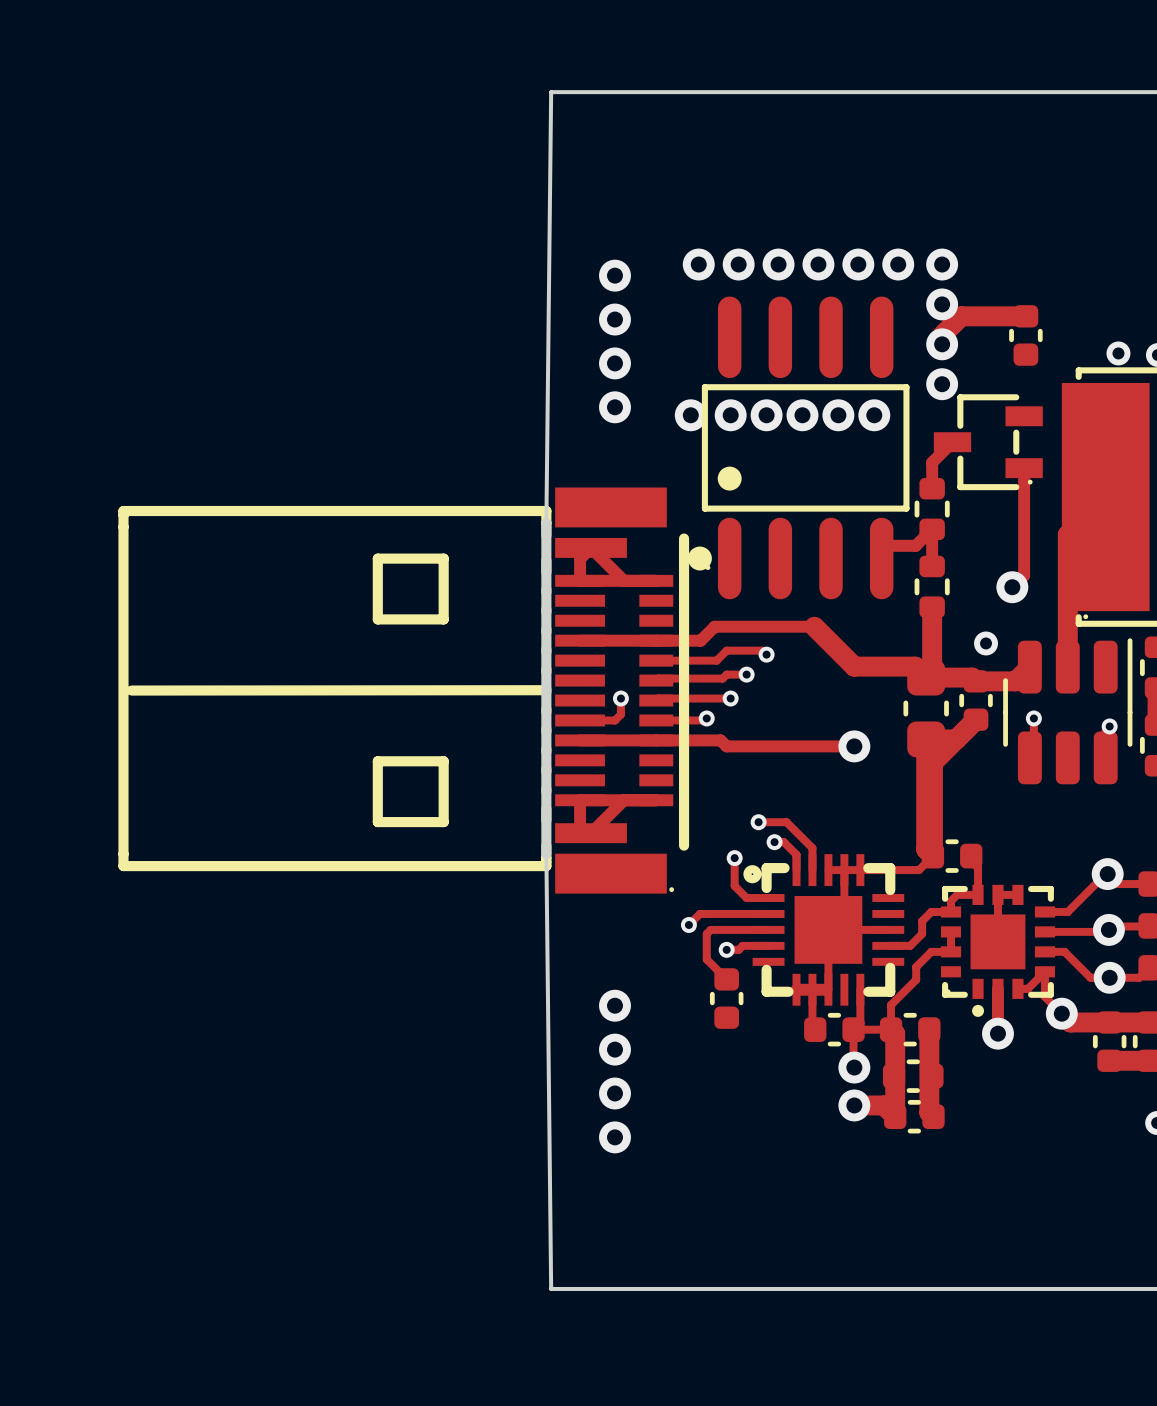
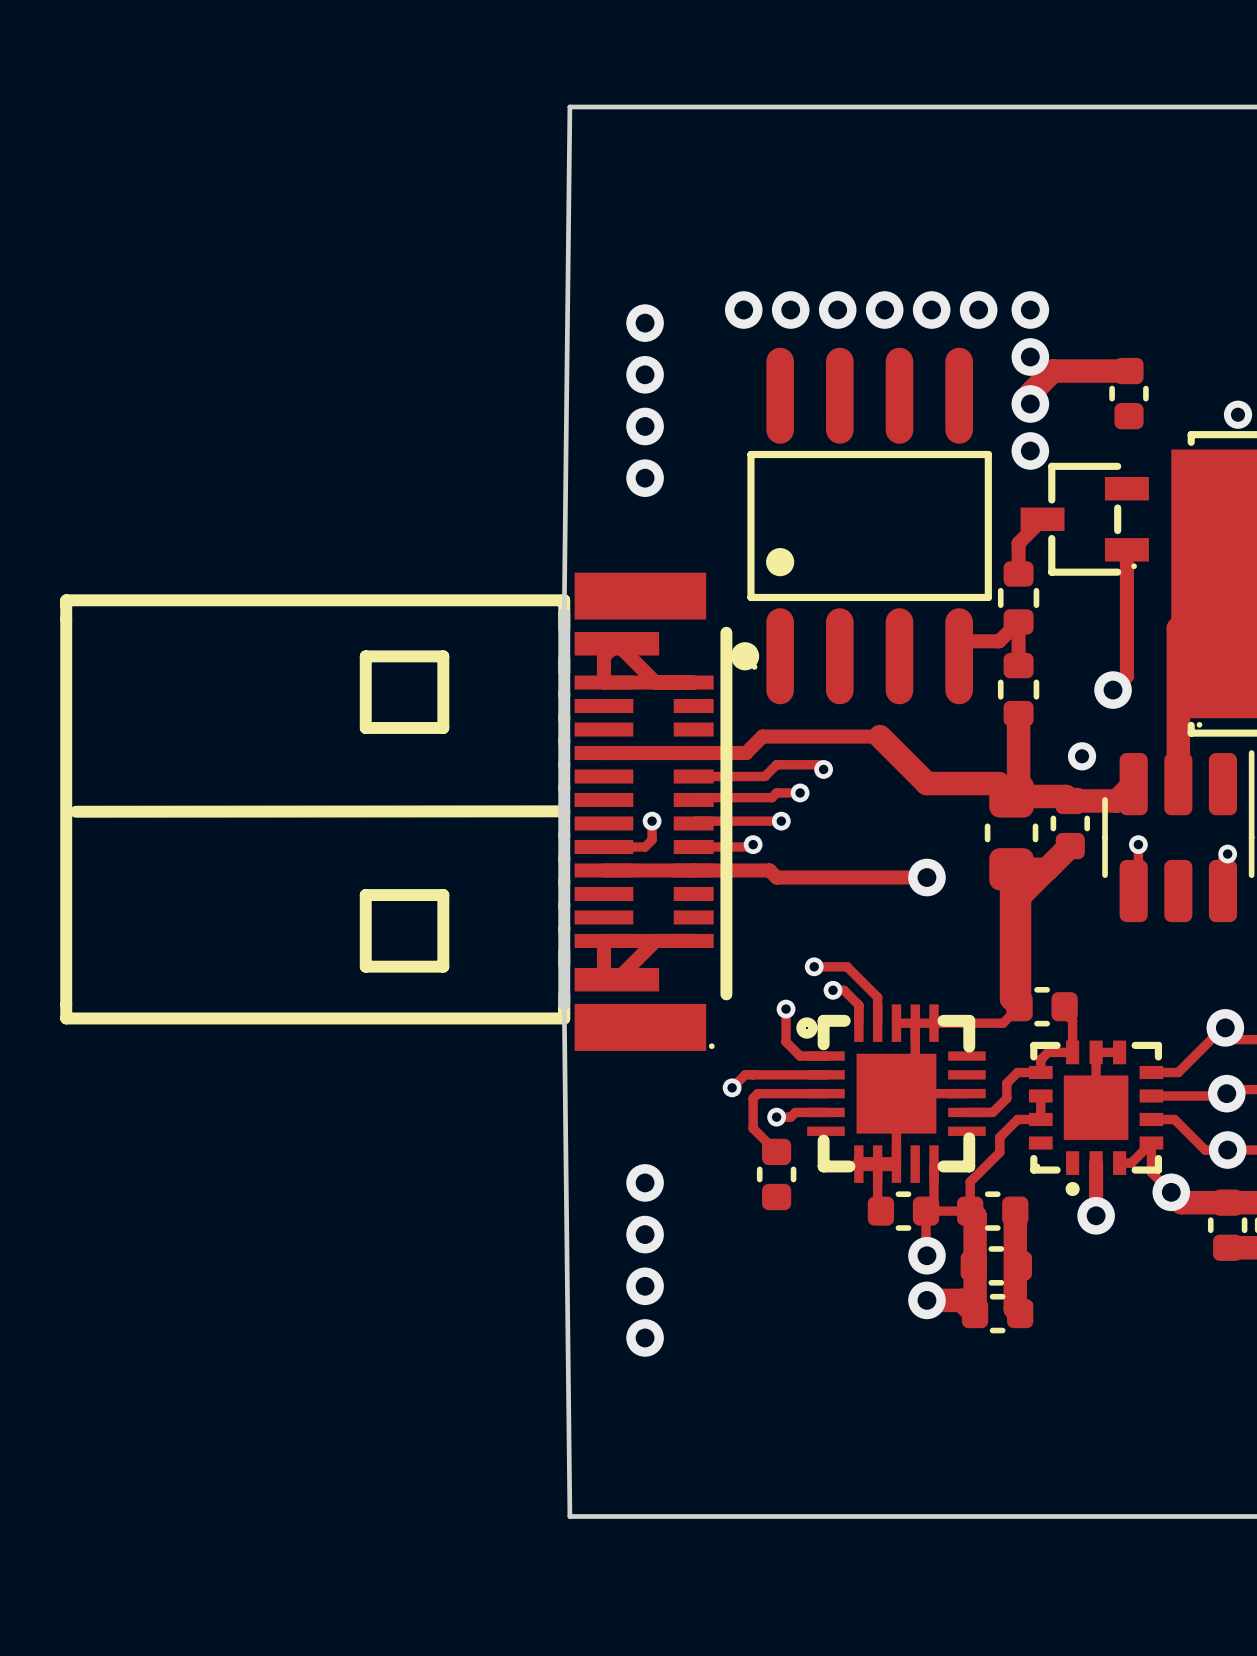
via: (690, 415) -> none
via: (730, 415) -> none
via: (766, 415) -> none
via: (802, 415) -> none
via: (838, 415) -> none
via: (874, 415) -> none

